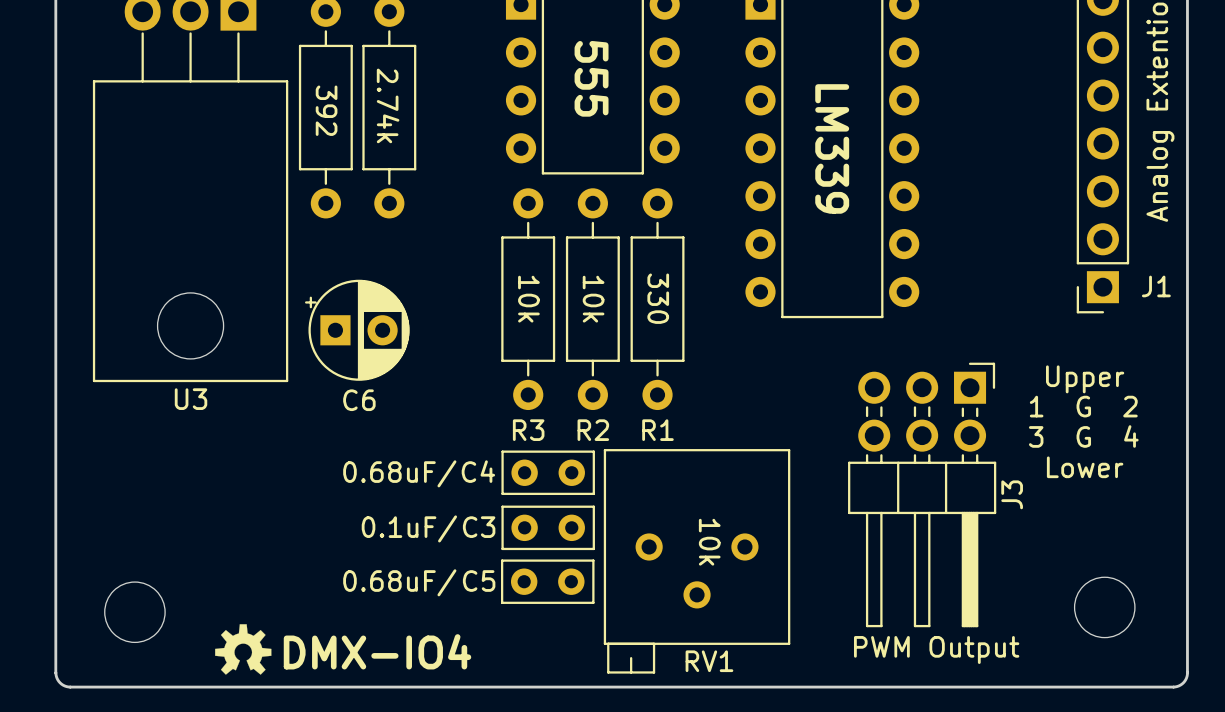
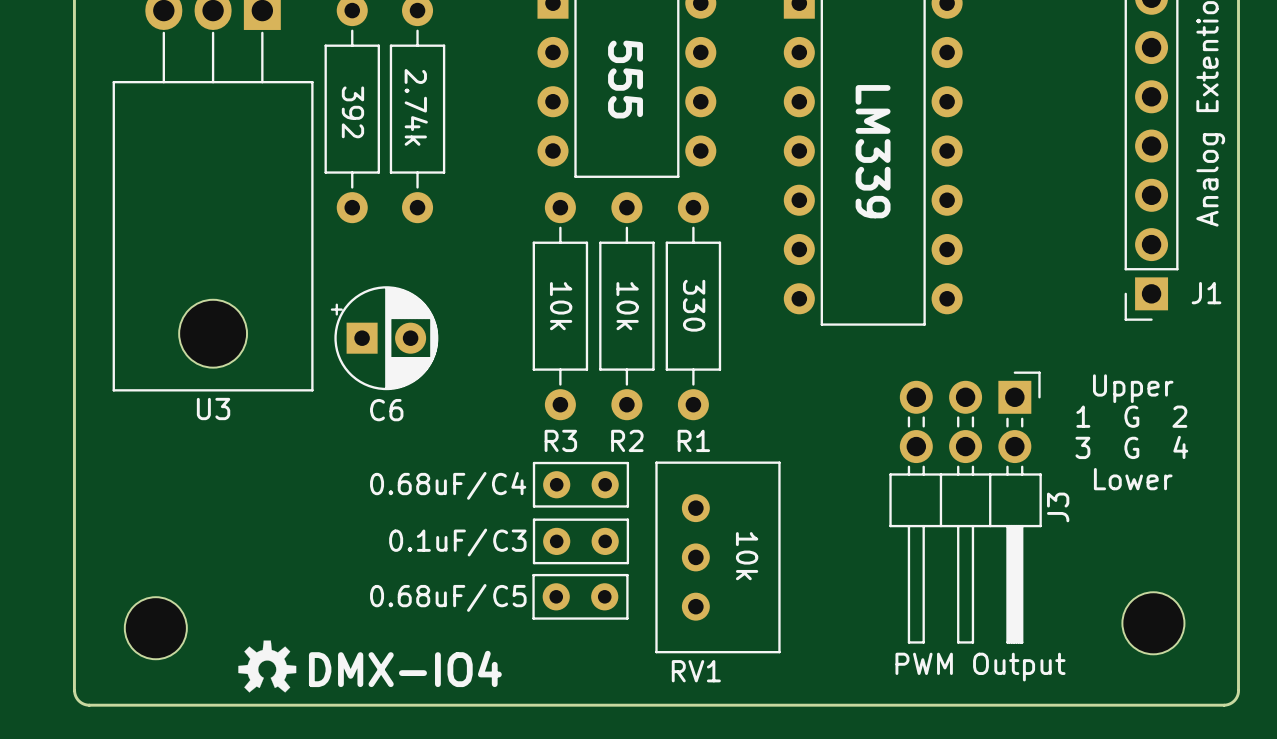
RV1 footprint: [603, 449, 791, 674] -> [655, 461, 781, 654]

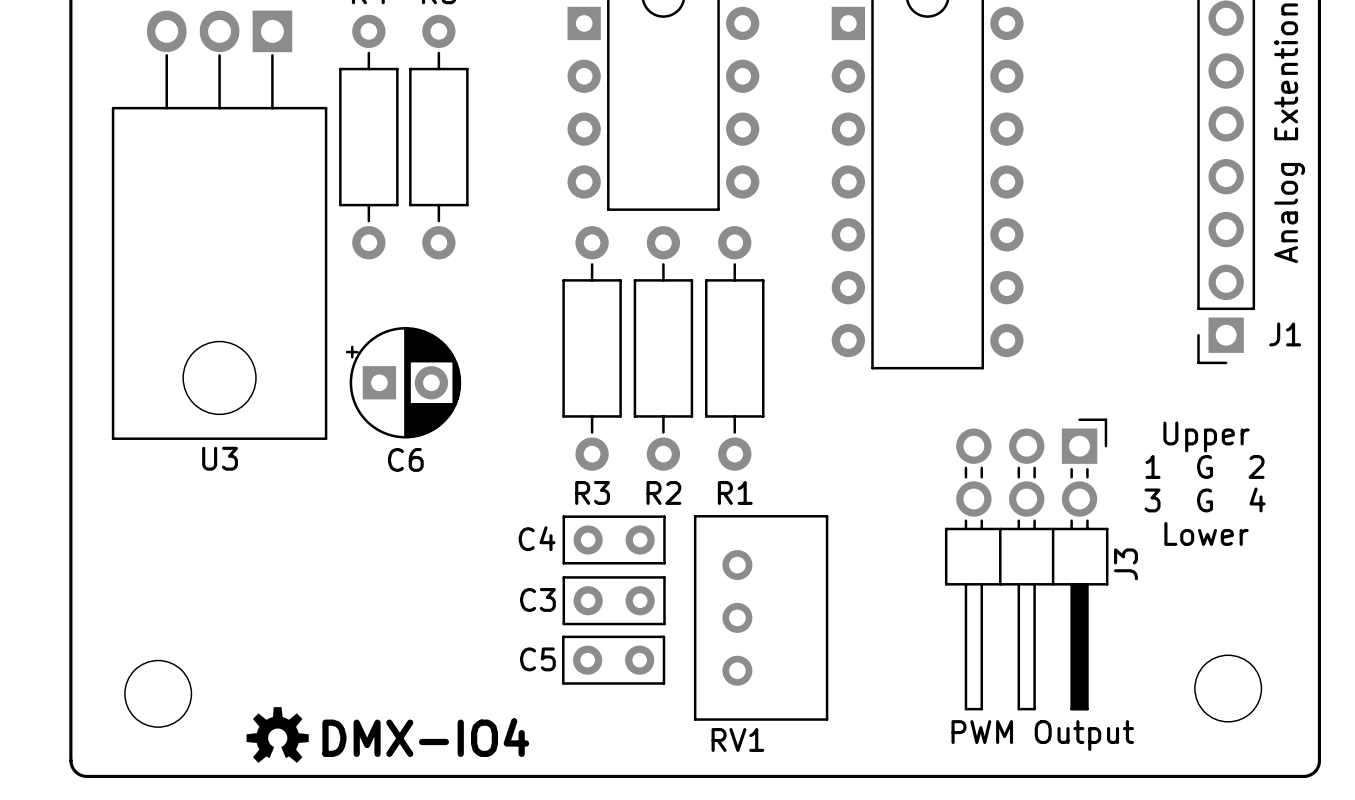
text: 555 (625, 79) -> none
text: 2.74k (416, 107) -> none
text: 392 (352, 112) -> none
text: LM339 (873, 151) -> none
text: 330 (694, 305) -> none
text: 10k (561, 306) -> none
text: 10k (627, 306) -> none
text: 0.68uF/ (428, 485) -> none
text: 0.1uF/ (438, 542) -> none
text: 10k (747, 556) -> none
text: 0.68uF/ (428, 597) -> none

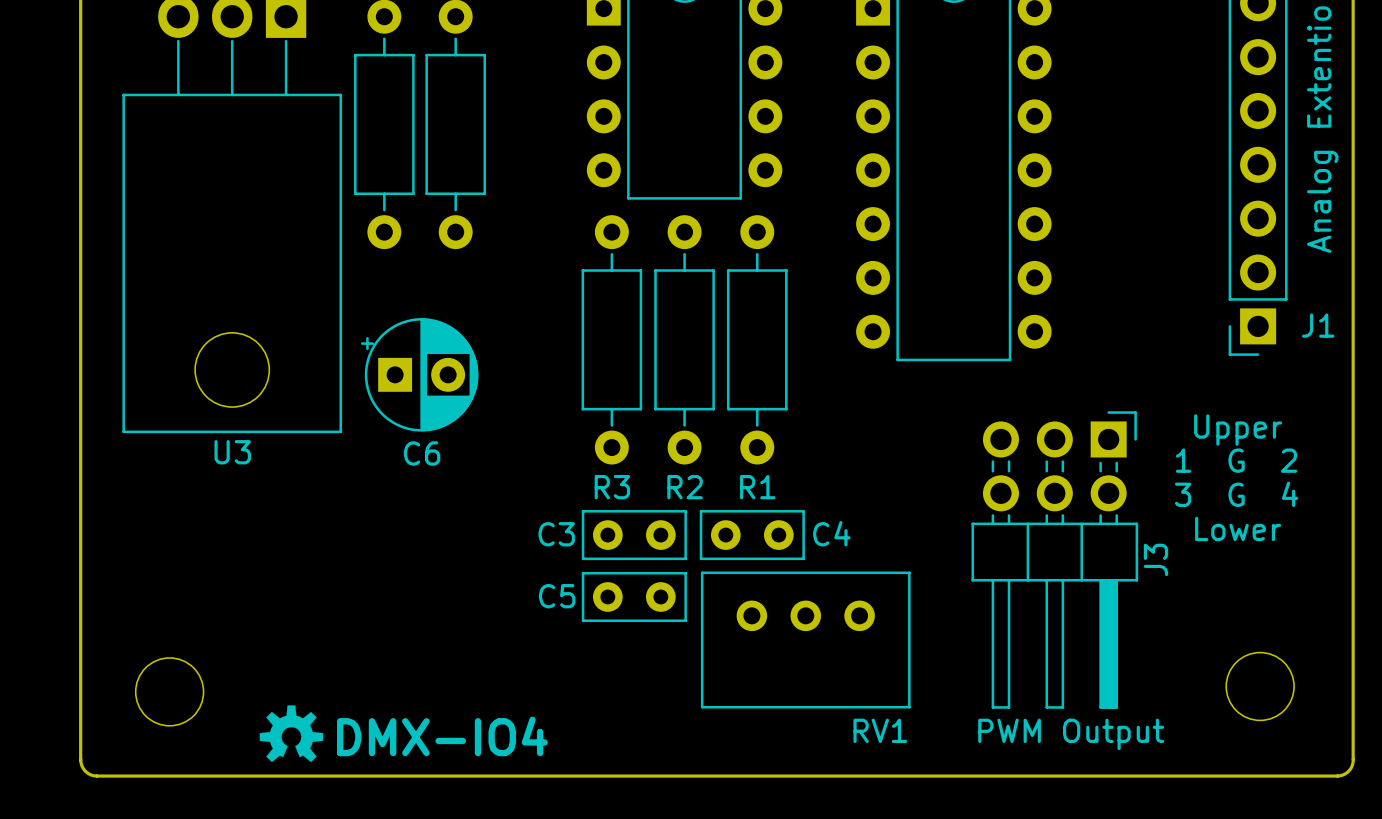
C4 name: C4 (537, 538) -> C3 (556, 534)
C4: none -> (752, 535)
C3 name: C3 (537, 599) -> C5 (557, 596)
RV1 rotation: 0° (761, 617) -> 90° clockwise (805, 640)
C5: (613, 660) -> none
RV1 name position: RV1 (737, 739) -> RV1 (880, 730)

